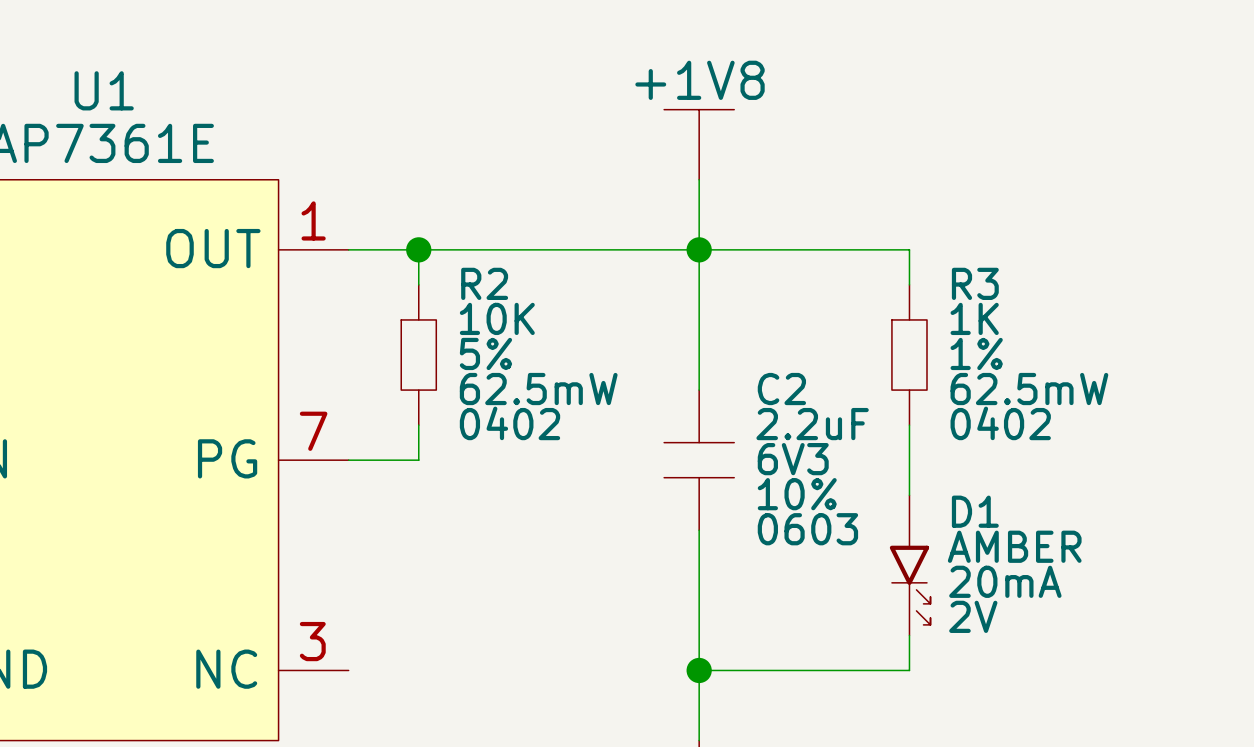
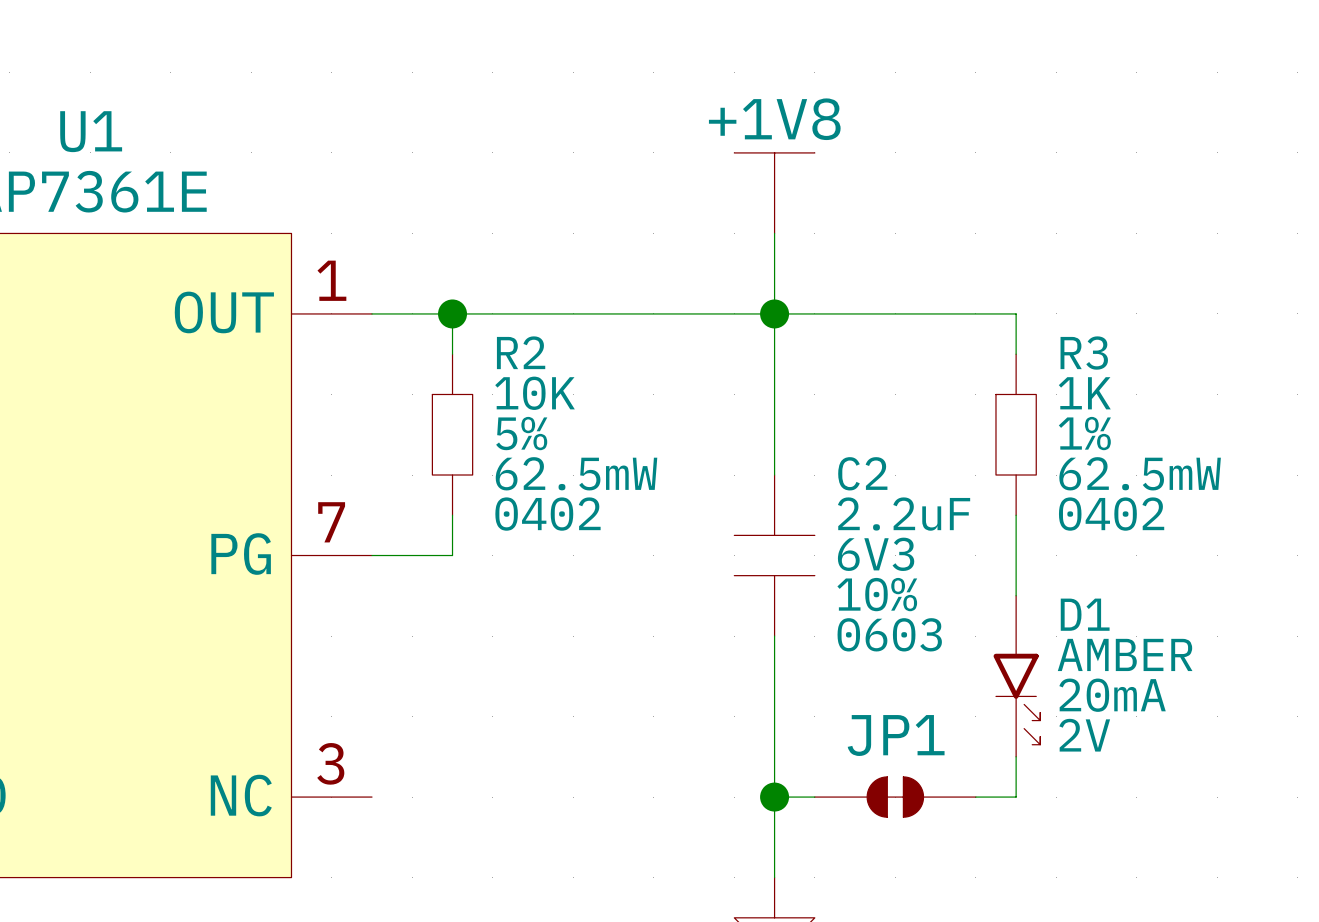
JP1: none -> (895, 797)

